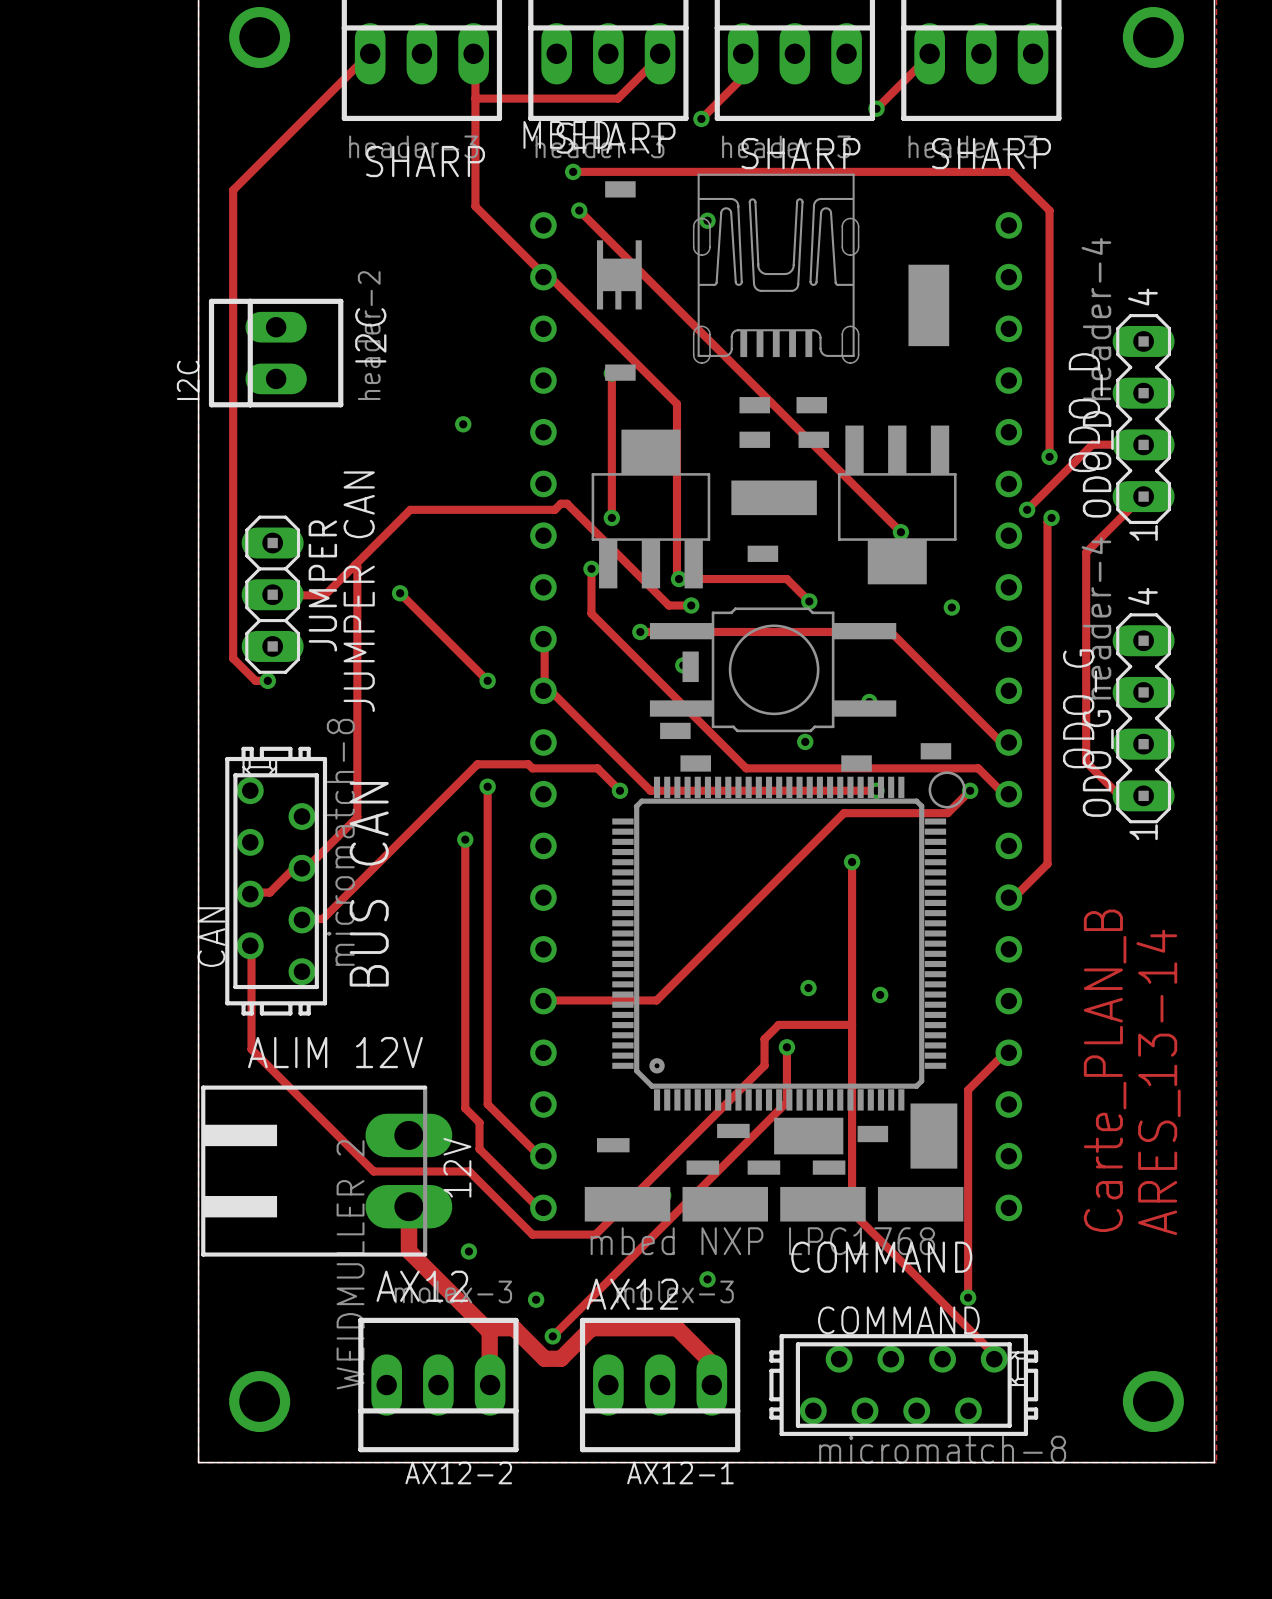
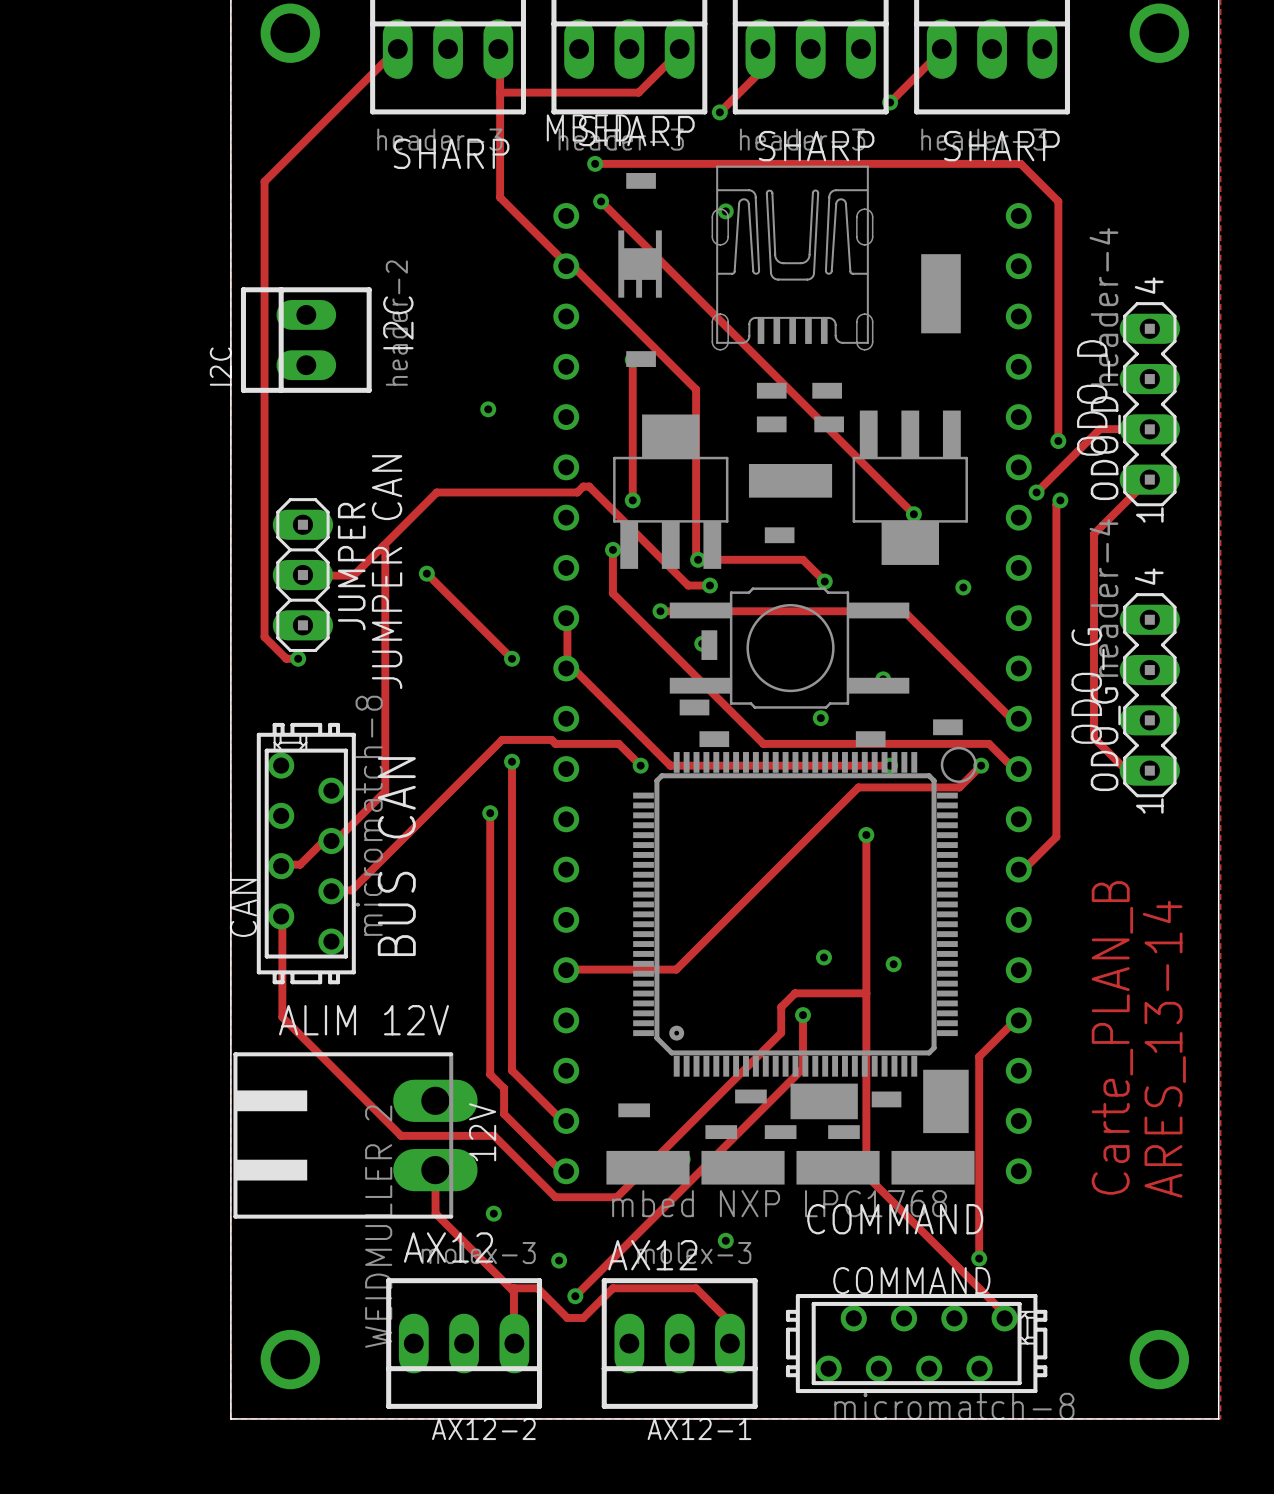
track width: thick (408, 1206) (409, 1251) (488, 1330) -> thin (435, 1170) (435, 1213) (512, 1290)
track width: thick (711, 1362) (676, 1328) (591, 1328) (560, 1358) (544, 1358) (514, 1328) (489, 1328) (489, 1383) -> thin (729, 1321) (696, 1288) (612, 1288) (583, 1317) (567, 1317) (537, 1288) (513, 1288) (513, 1341)

